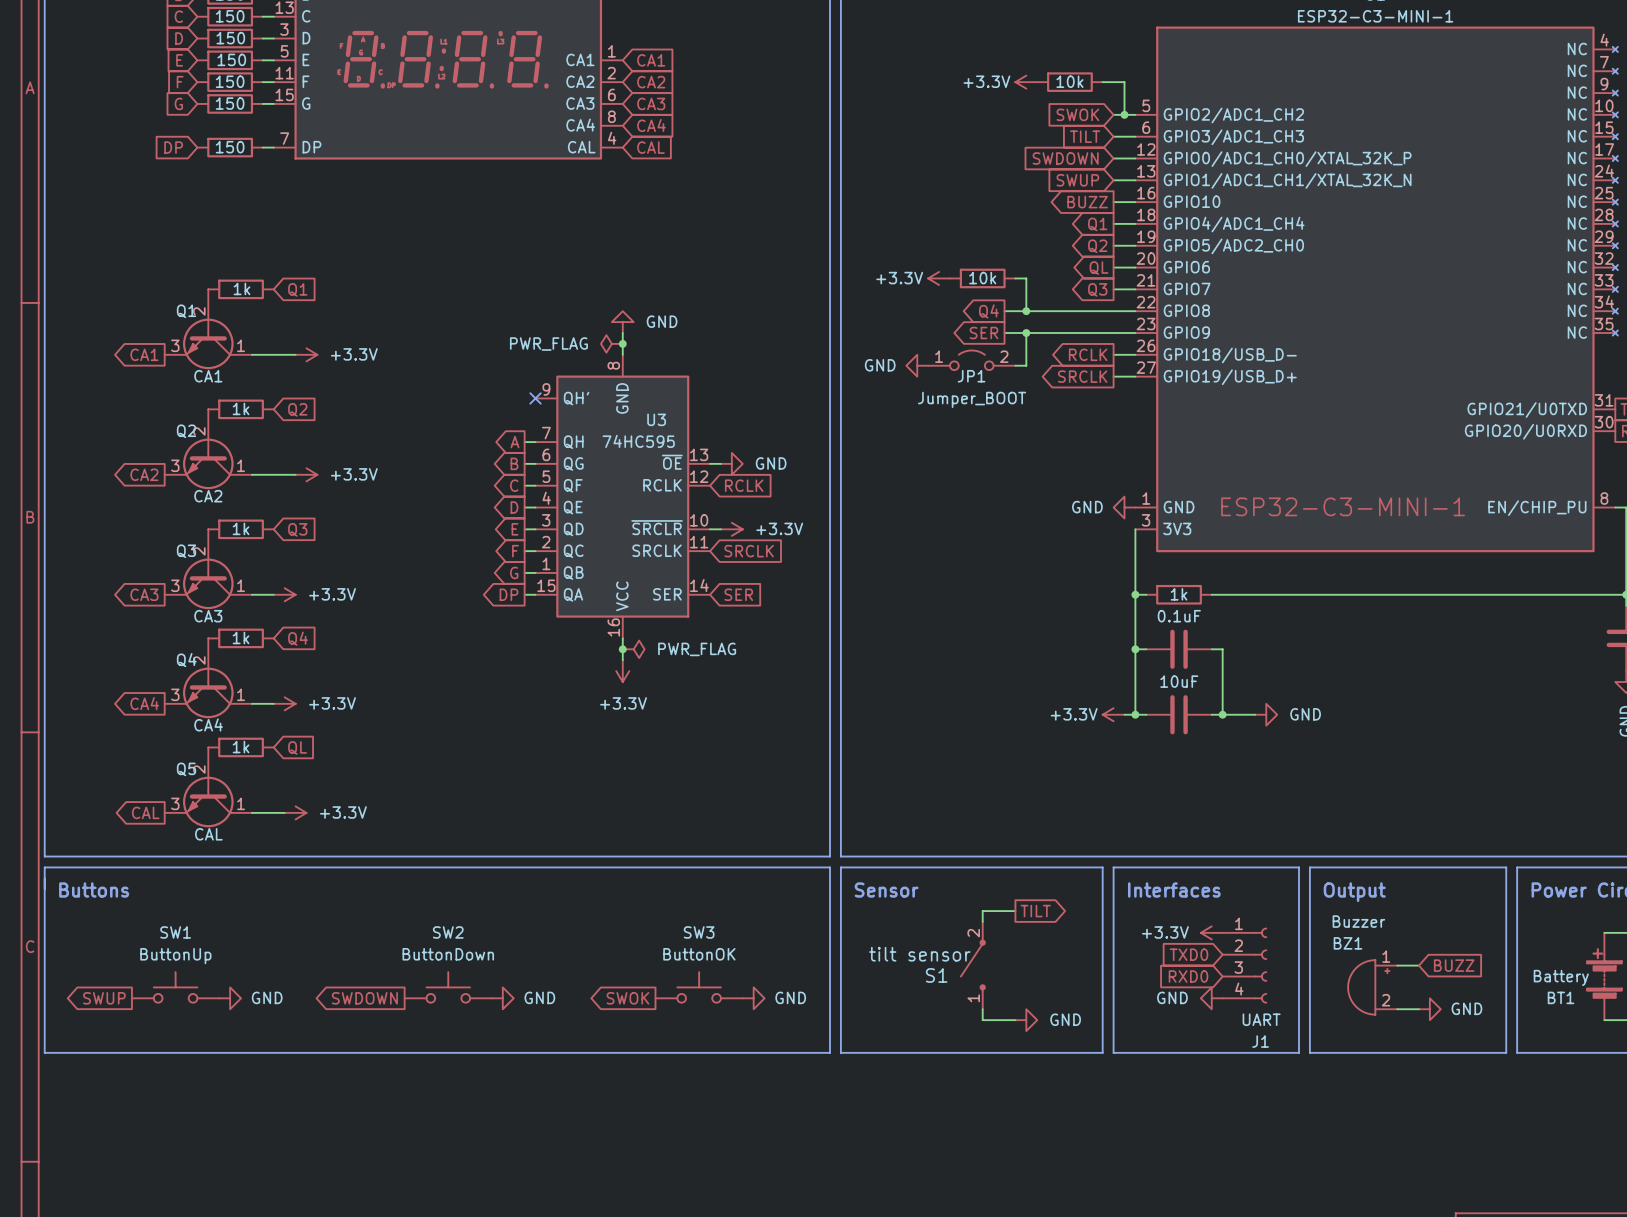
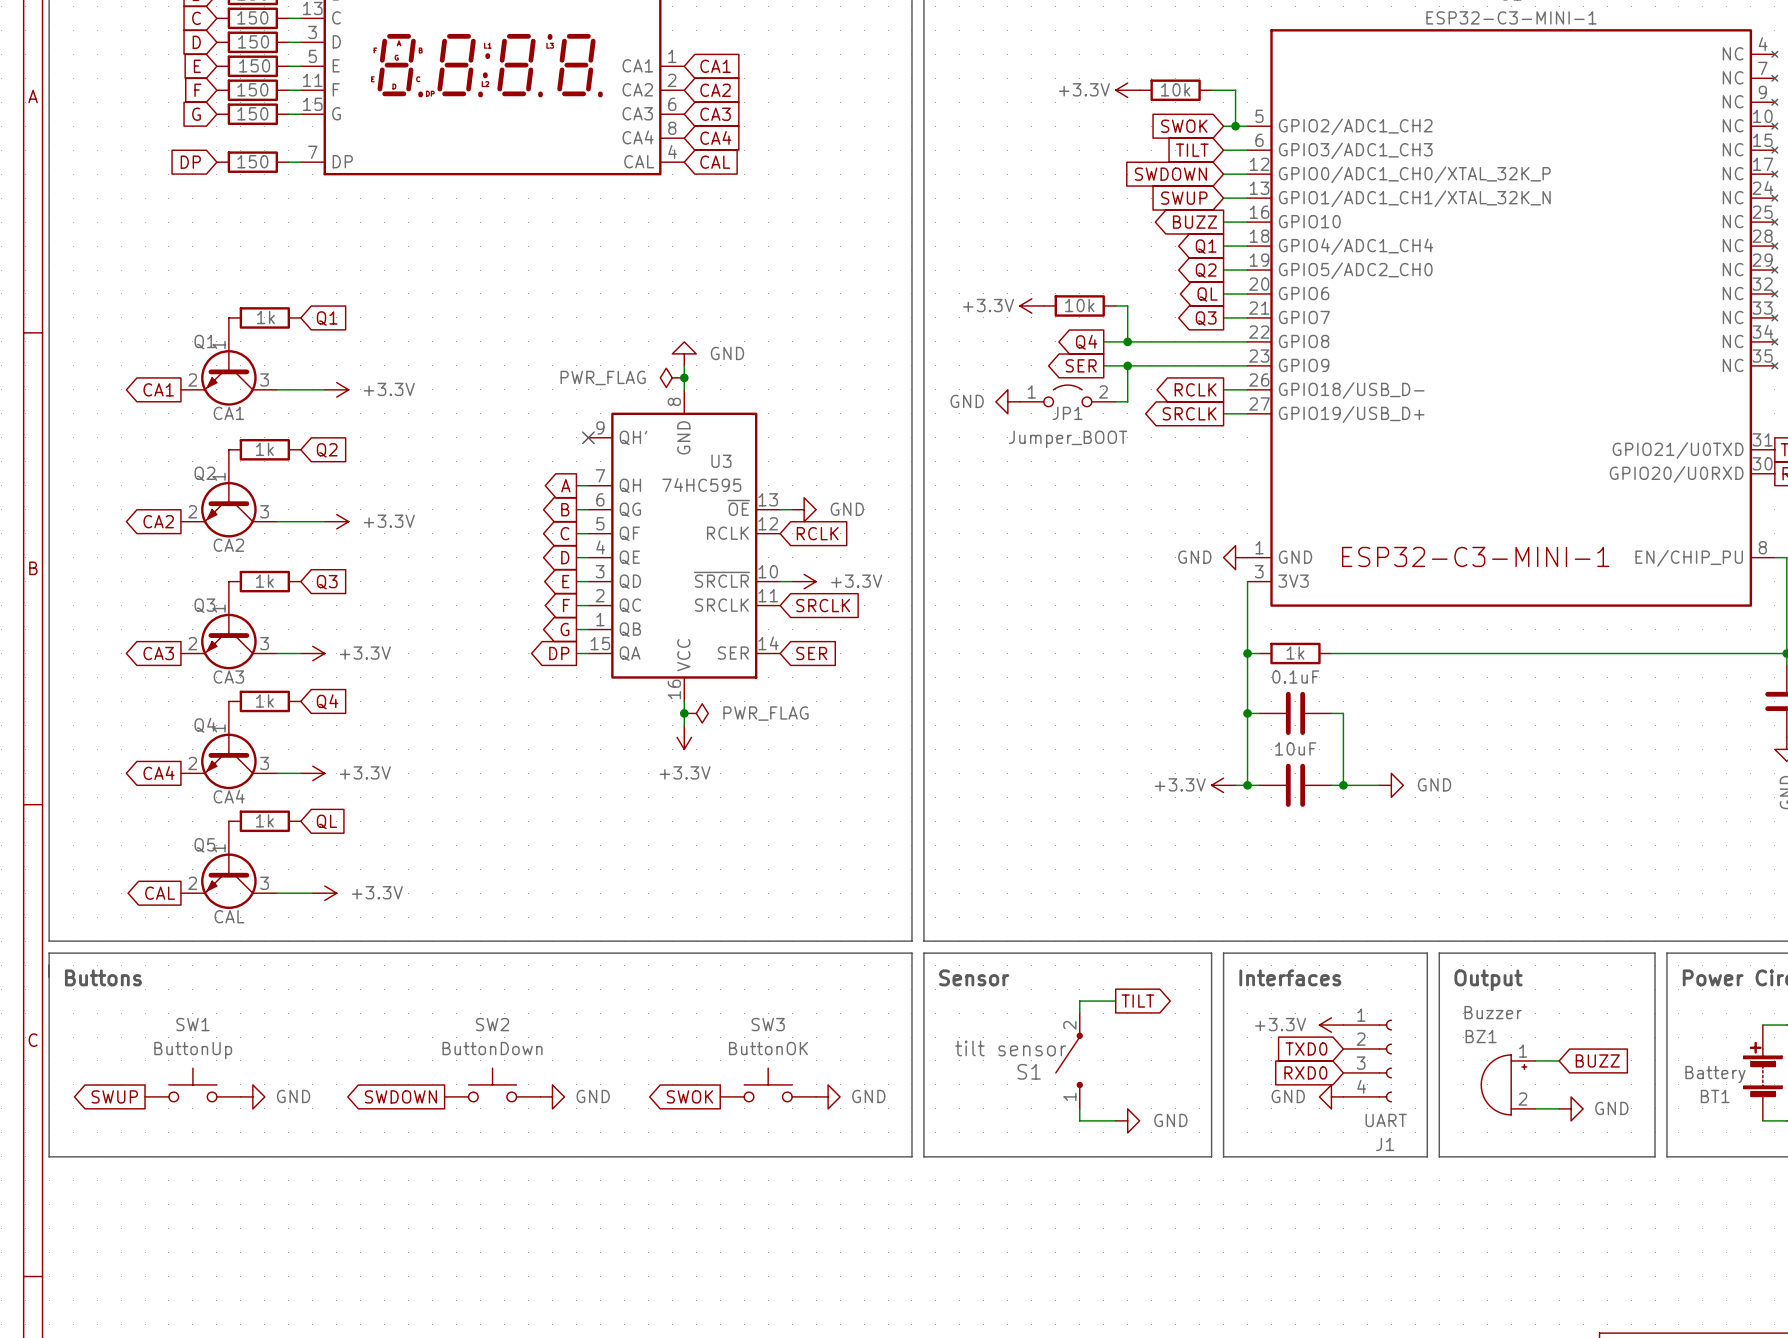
Q1 symbol: [164, 289, 252, 370] -> [180, 317, 277, 406]
Q2 symbol: [164, 409, 252, 490] -> [180, 449, 277, 538]
Q3 symbol: [164, 529, 252, 610] -> [180, 581, 277, 670]
Q4 symbol: [164, 638, 252, 719] -> [180, 701, 277, 790]
Q5 symbol: [164, 747, 252, 828] -> [180, 821, 277, 910]

